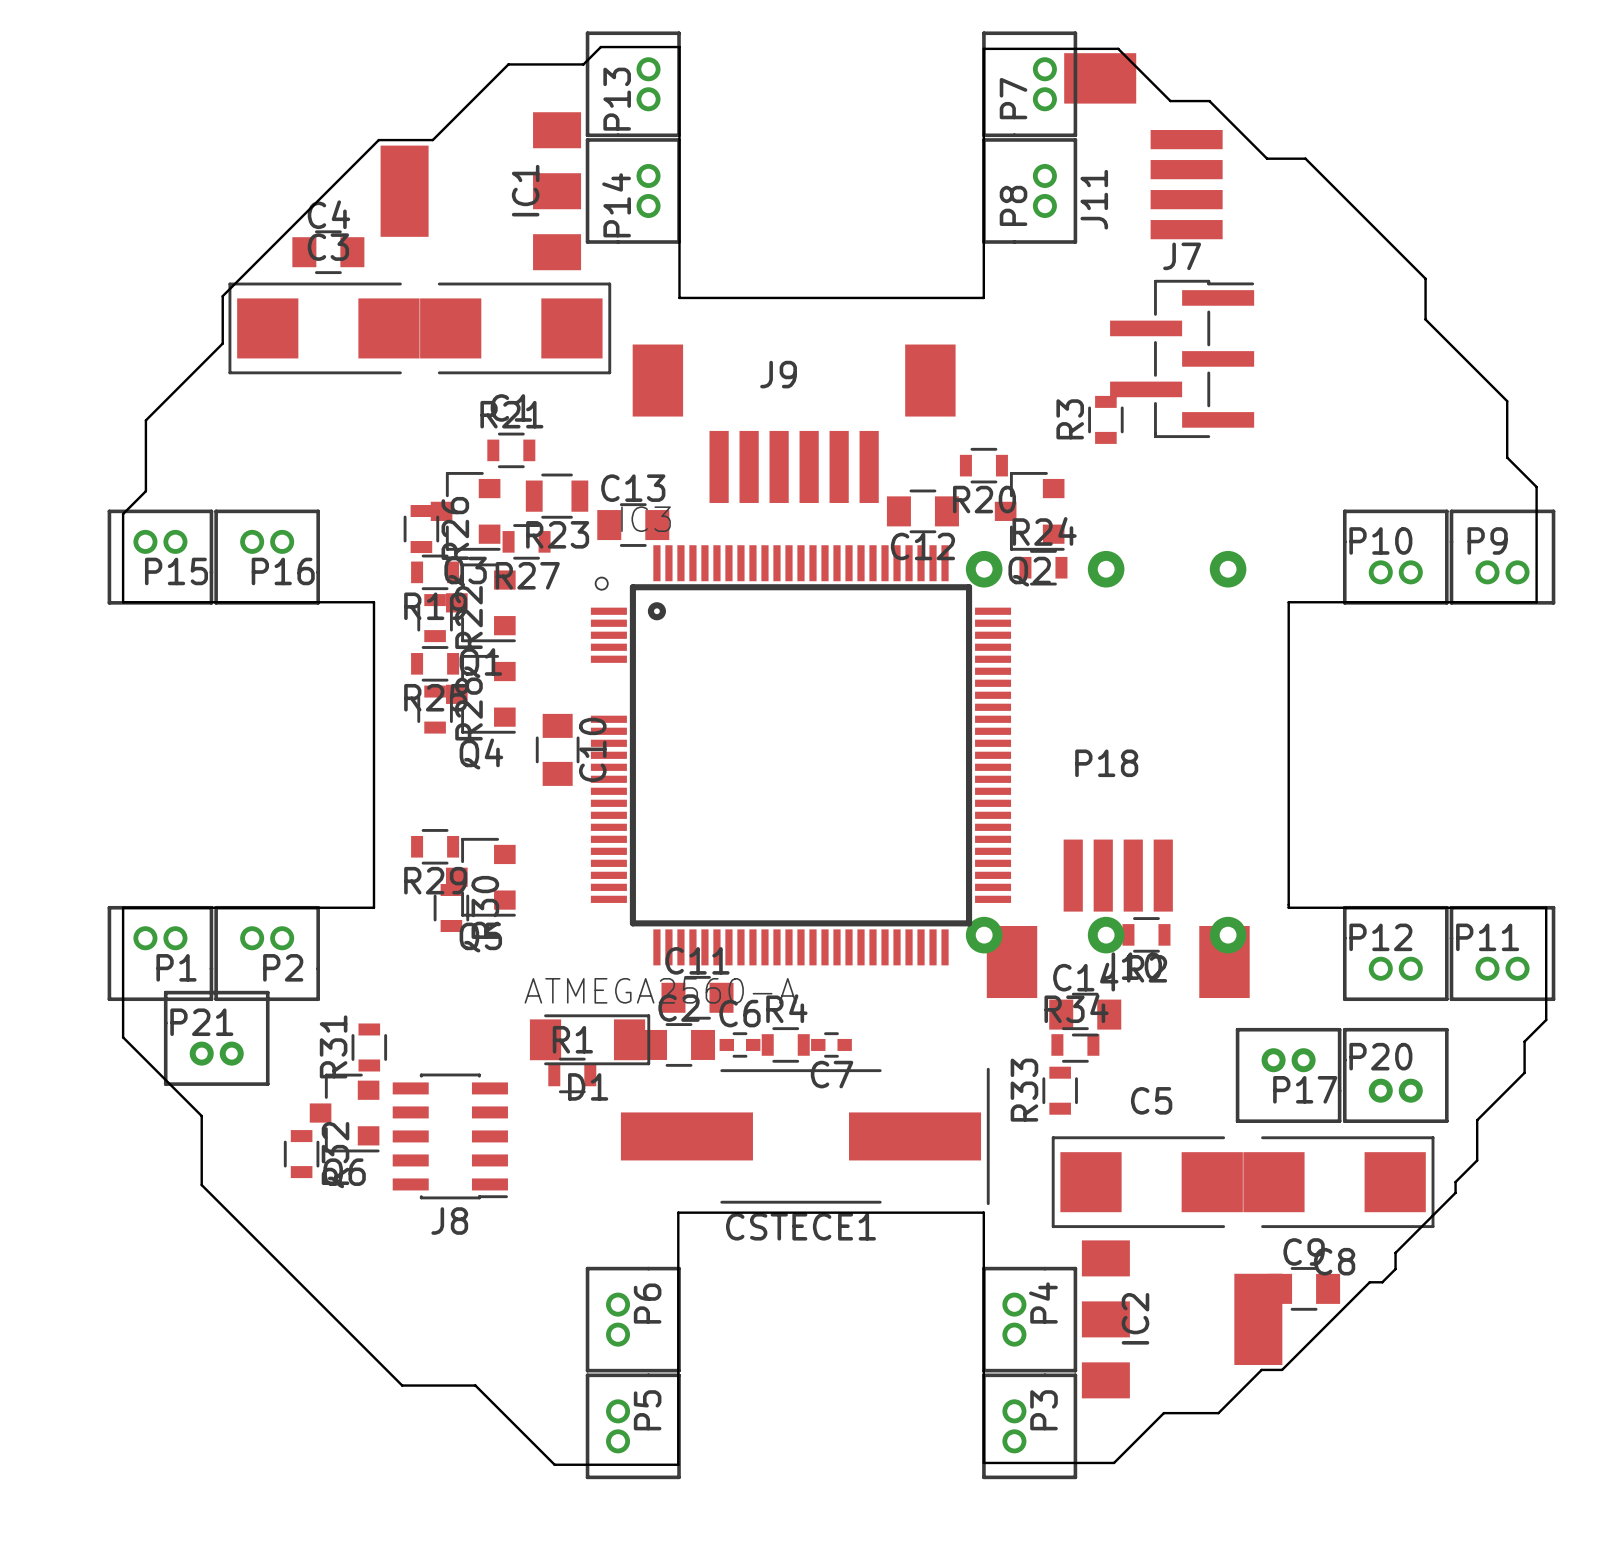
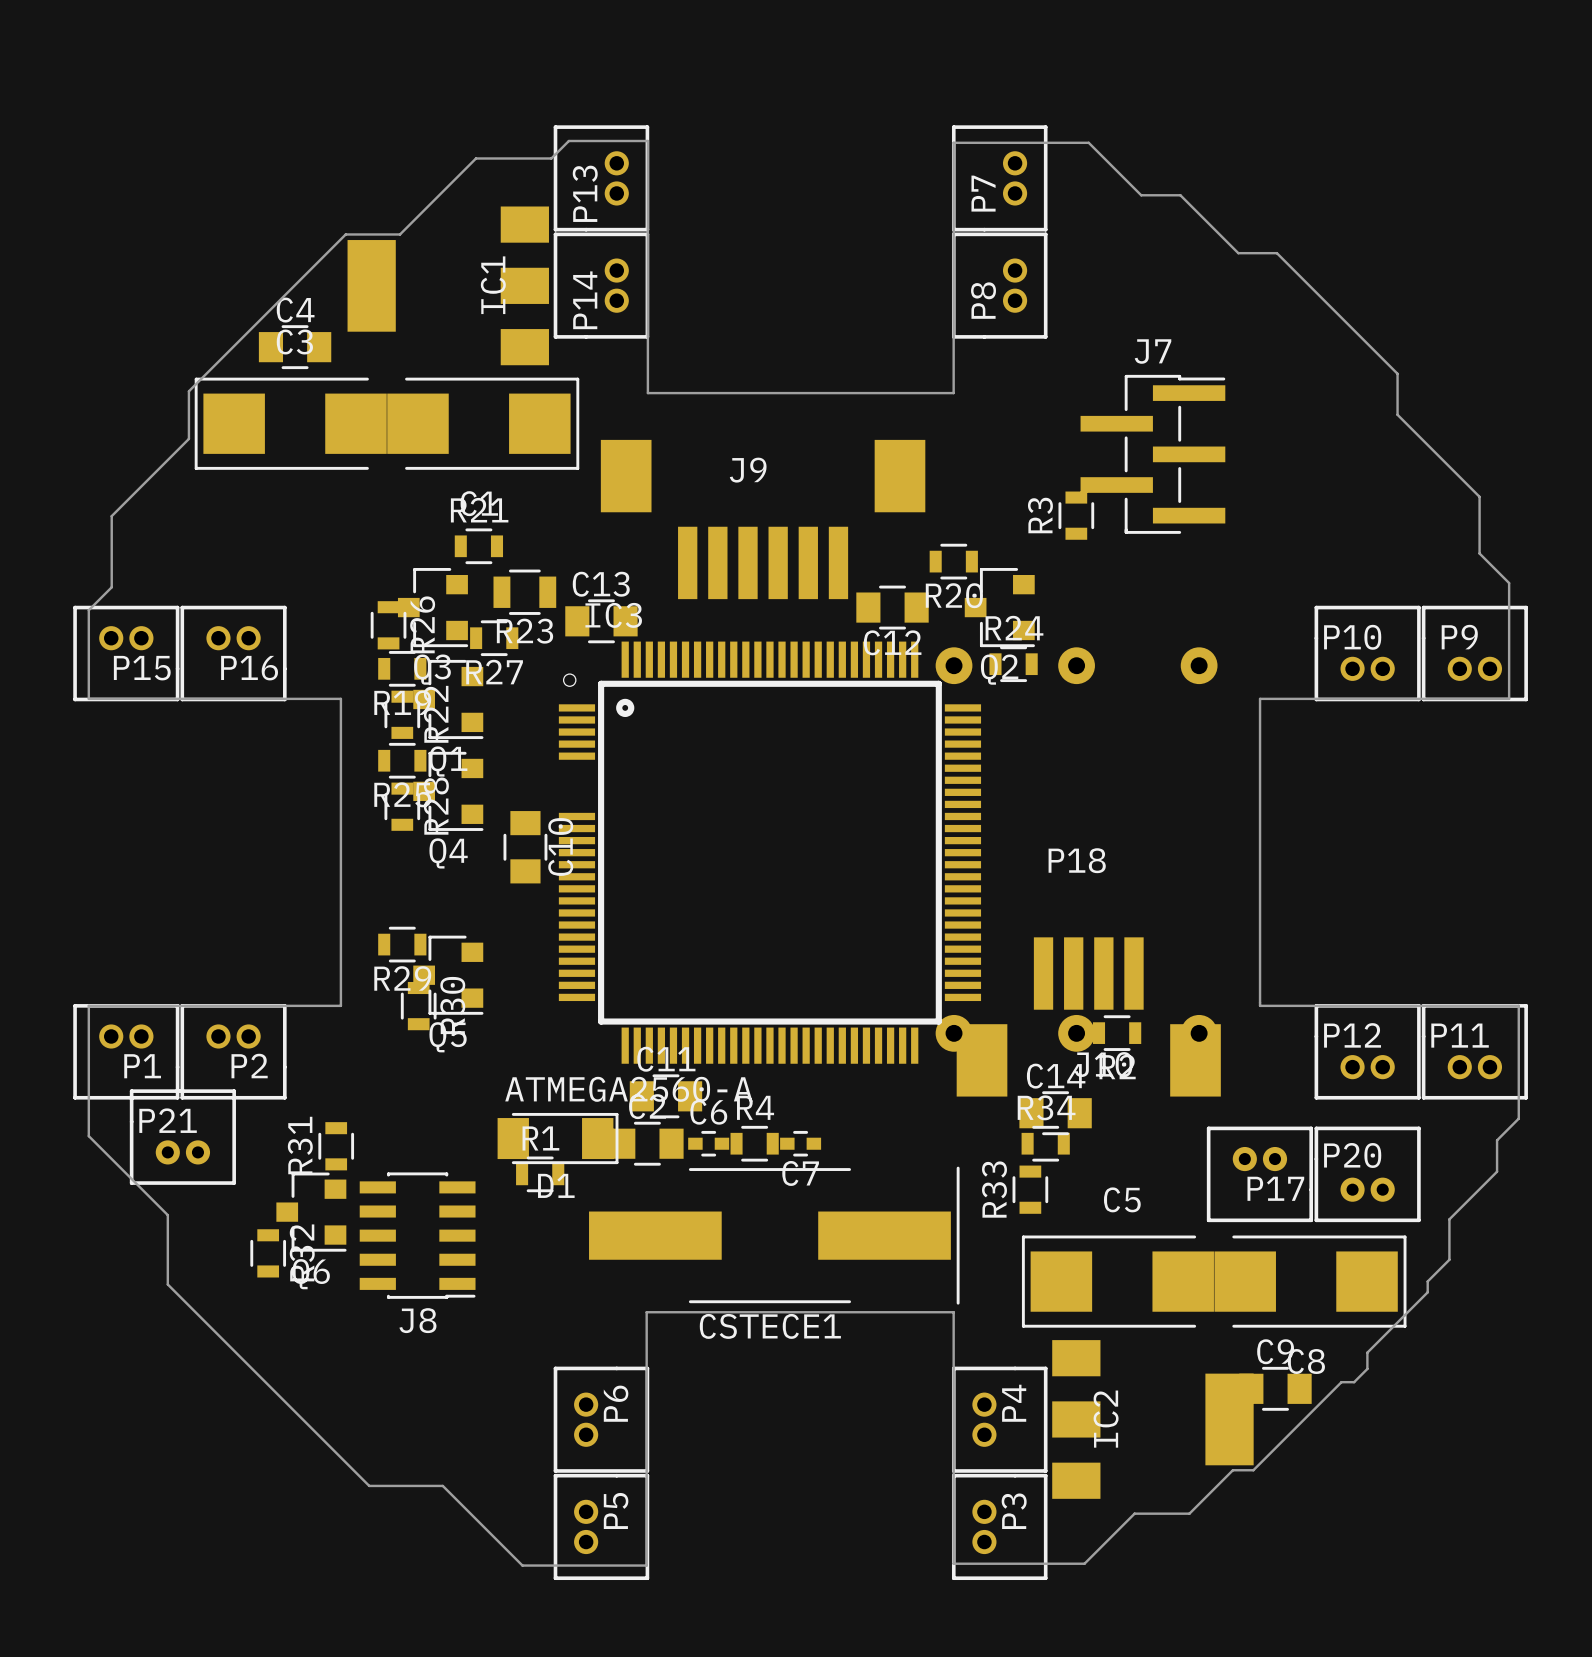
J11: (1143, 146) -> none

